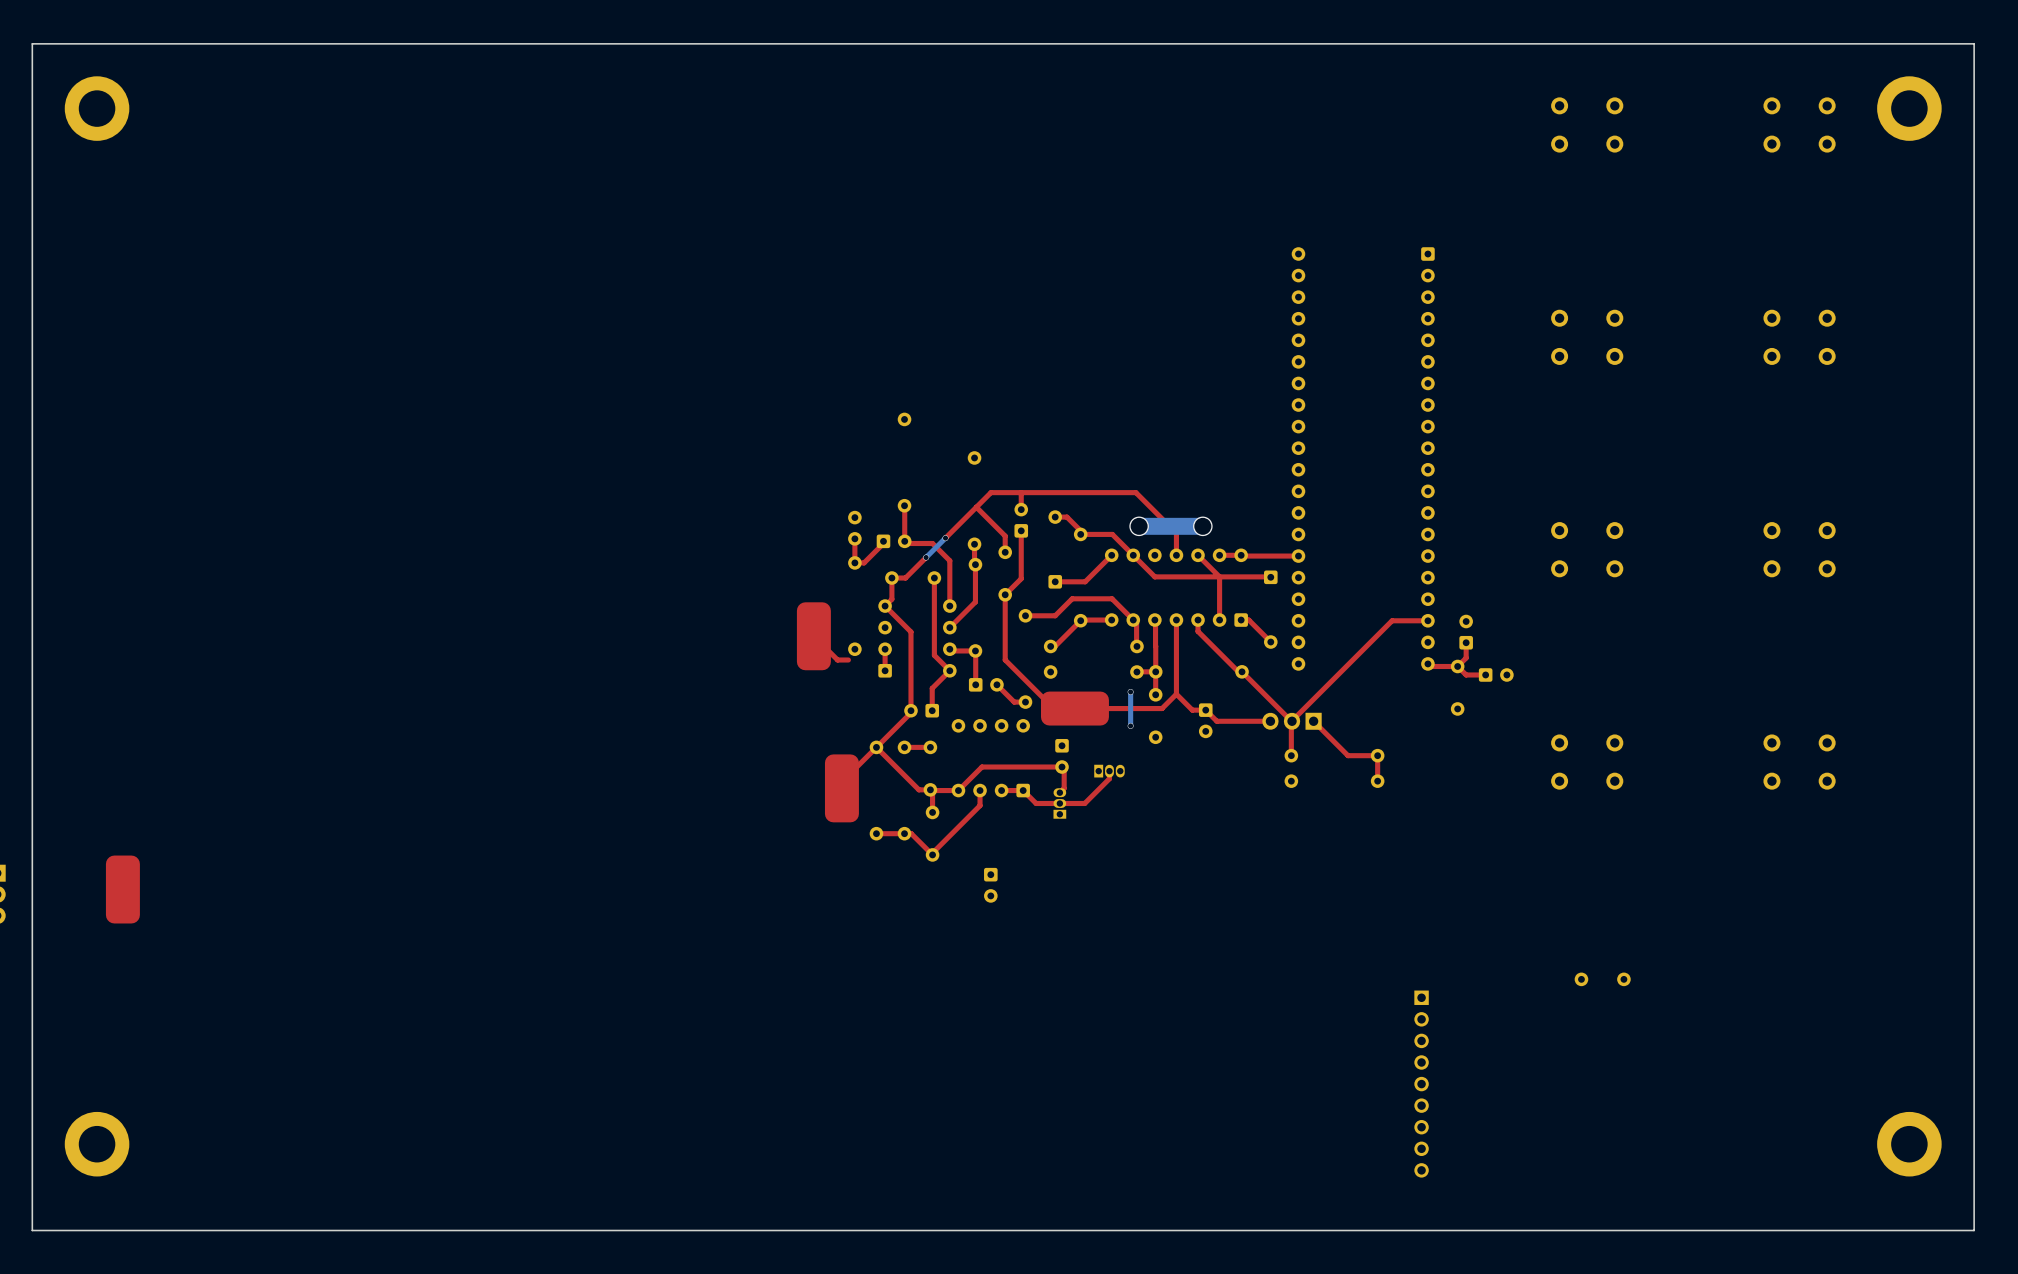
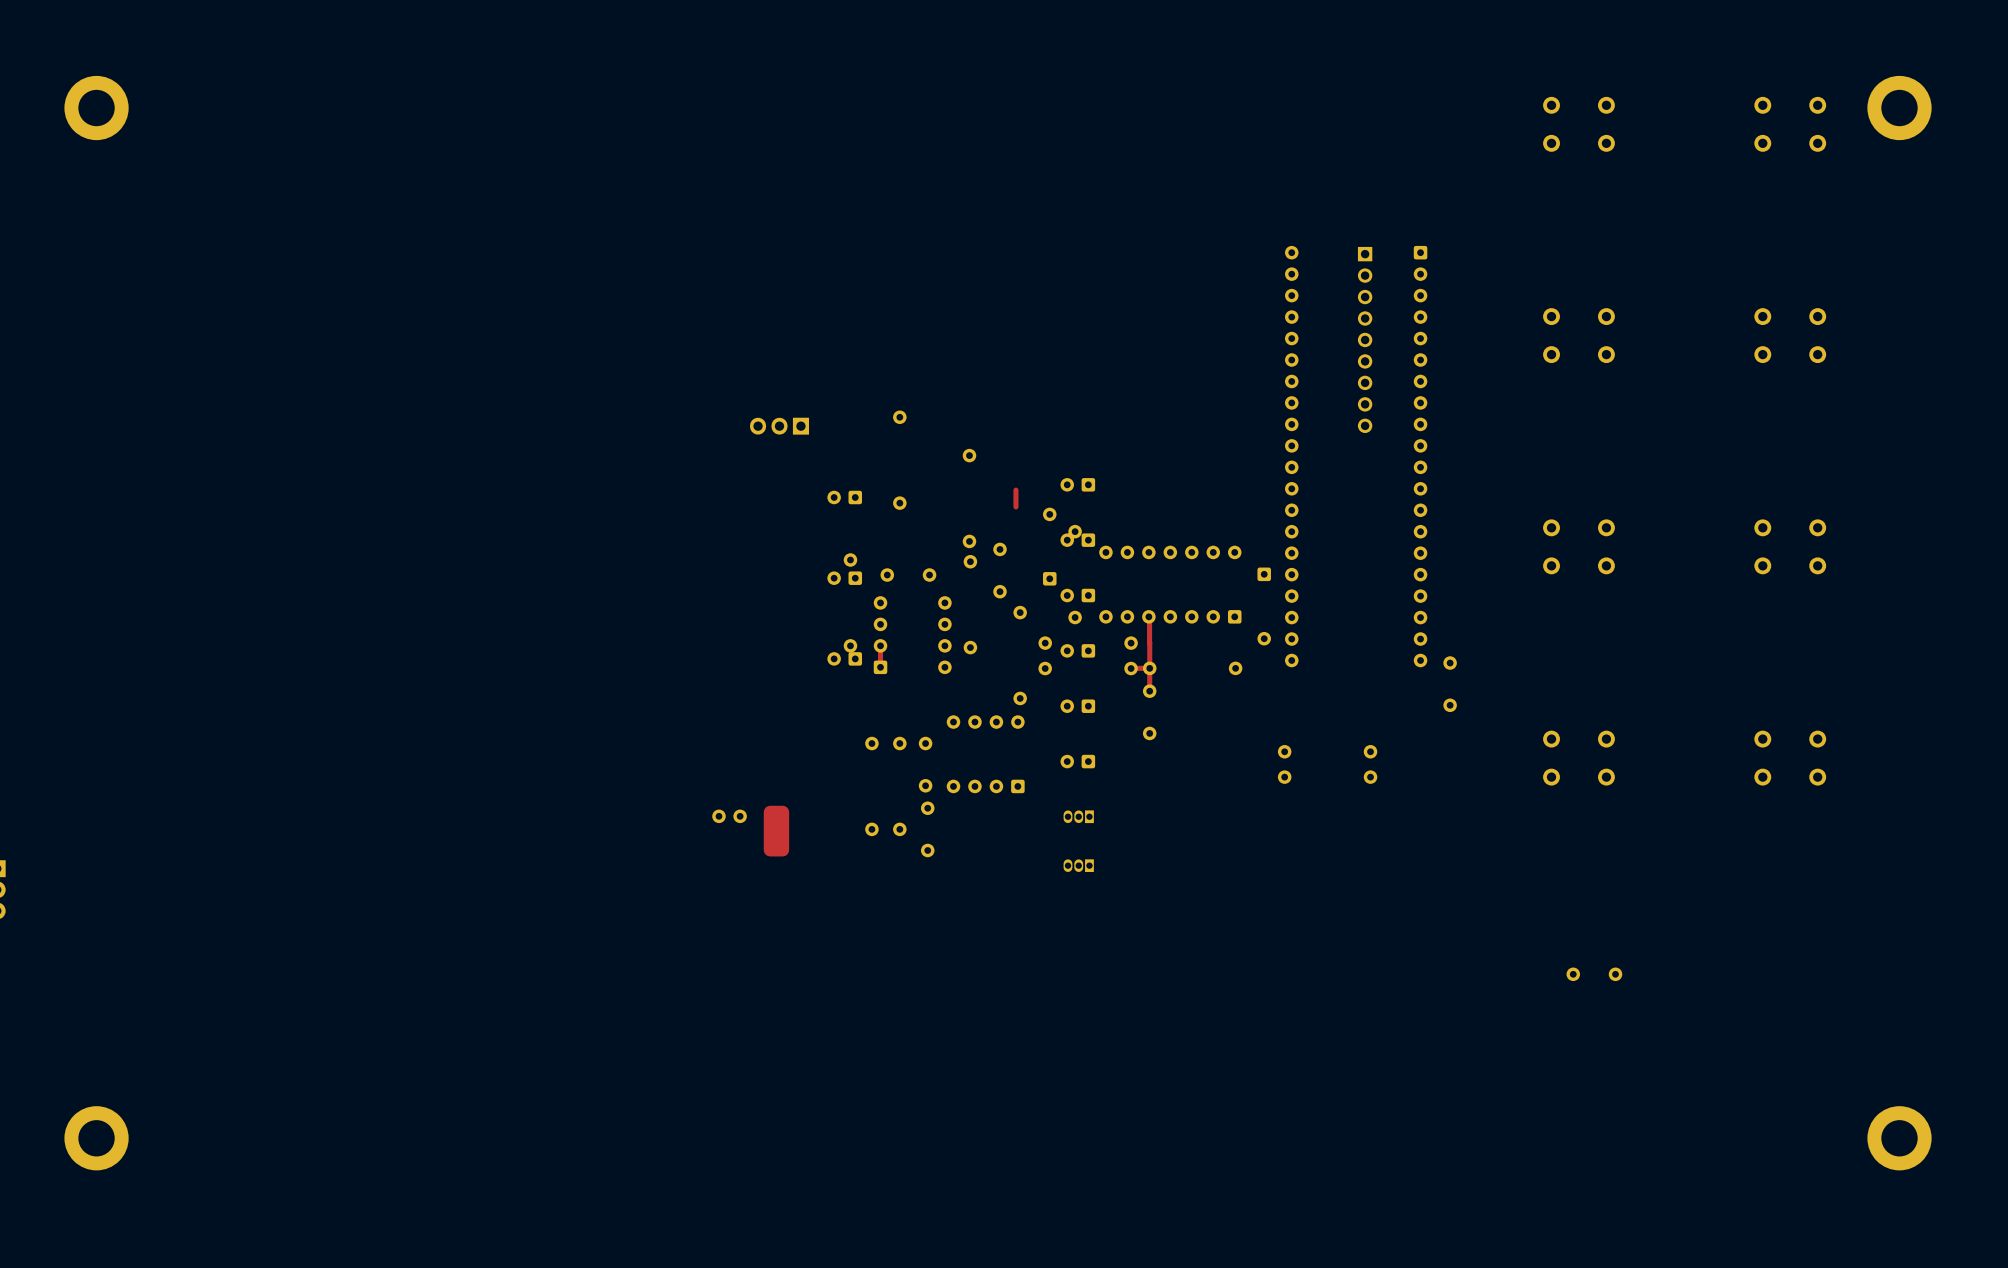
board edge: (1974, 43) (32, 43) (32, 1230) (1974, 1230) (1974, 43) -> none
part: none -> (1365, 339)
part: none -> (779, 426)
part: none -> (1077, 484)
part: none -> (844, 497)
top track: (902, 504) (904, 507) (904, 541) (906, 543) (932, 543) (949, 560) (949, 606) (951, 603) -> none
top track: (976, 507) (1005, 536) (1005, 552) -> none
top track: (1055, 517) (1066, 517) (1080, 530) (1080, 534) (1112, 534) (1154, 576) (1270, 577) -> none
part: (1021, 520) -> none
via: (1139, 526) -> none
bottom track: (1202, 526) (1139, 526) -> none
via: (1202, 526) -> none
part: (854, 528) -> none
top track: (1021, 530) (1021, 578) (1005, 594) (1005, 659) (1053, 708) (1162, 708) (1176, 694) -> none
top track: (854, 538) (854, 562) (864, 562) (883, 541) -> none
top track: (945, 538) (990, 492) (1135, 492) (1176, 533) (1176, 555) -> none
bottom track: (945, 538) (926, 557) -> none
via: (945, 538) -> none
part: (894, 541) -> none
part: none -> (1077, 540)
top track: (974, 544) (975, 602) (949, 627) -> none
top track: (1196, 554) (1219, 576) (1219, 620) -> none
top track: (1111, 555) (1085, 581) (1055, 581) -> none
top track: (1219, 555) (1298, 556) -> none
top track: (926, 557) (905, 578) (891, 578) (891, 599) (885, 606) (910, 631) (910, 712) (841, 781) (841, 788) -> none
via: (926, 557) -> none
top track: (934, 578) (934, 655) (949, 670) (932, 688) (932, 710) -> none
part: none -> (844, 578)
part: none -> (1077, 595)
top track: (1025, 615) (1055, 615) (1072, 598) (1112, 598) (1136, 623) (1136, 646) -> none
top track: (1111, 620) (1081, 620) (1054, 646) (1050, 646) -> none
top track: (1176, 620) (1176, 694) -> none
top track: (1198, 620) (1198, 631) (1292, 721) -> none
top track: (1241, 620) (1248, 620) (1270, 642) -> none
top track: (1427, 620) (1392, 620) (1292, 721) -> none
part: (1466, 632) -> none
top track: (813, 636) (837, 660) (848, 660) -> none
part: (813, 636) -> none
top track: (1466, 642) (1466, 657) (1457, 666) -> none
top track: (949, 649) (951, 650) (975, 651) (975, 684) -> none
part: none -> (1077, 650)
part: none -> (844, 658)
top track: (1427, 663) (1430, 666) (1457, 666) -> none
top track: (1457, 666) (1466, 674) (1485, 674) -> none
part: (1496, 674) -> none
part: (986, 684) -> none
top track: (996, 684) (1014, 702) (1025, 702) -> none
bottom track: (1130, 691) (1130, 725) -> none
via: (1130, 691) -> none
top track: (1176, 694) (1192, 710) (1205, 710) (1216, 721) (1270, 721) -> none
part: (1074, 708) -> none
part: none -> (1077, 706)
part: (921, 710) -> none
part: (1205, 720) -> none
top track: (1292, 721) (1291, 755) -> none
part: (1292, 721) -> none
top track: (1313, 721) (1348, 755) (1377, 755) (1377, 781) -> none
via: (1130, 725) -> none
top track: (876, 747) (918, 789) (930, 789) (932, 792) (932, 812) -> none
top track: (930, 747) (904, 747) -> none
part rotation: 0° (1062, 756) -> 90° clockwise (1077, 761)
part position: (1062, 756) -> (1077, 761)
top track: (1109, 771) (1109, 778) (1084, 803) (1036, 803) (1023, 790) (1001, 790) -> none
part: (1109, 771) -> none
part: (841, 788) -> none
top track: (931, 790) (958, 790) (981, 767) (1062, 767) (1064, 769) (1064, 788) (1059, 792) -> none
top track: (980, 790) (980, 805) (932, 854) (911, 833) (876, 833) -> none
part: (1059, 803) -> none
part: none -> (729, 816)
part: none -> (1078, 816)
part: none -> (776, 831)
part: none -> (1078, 865)
part: (990, 885) -> none
part: (122, 889) -> none
part: (1421, 1084) -> none

